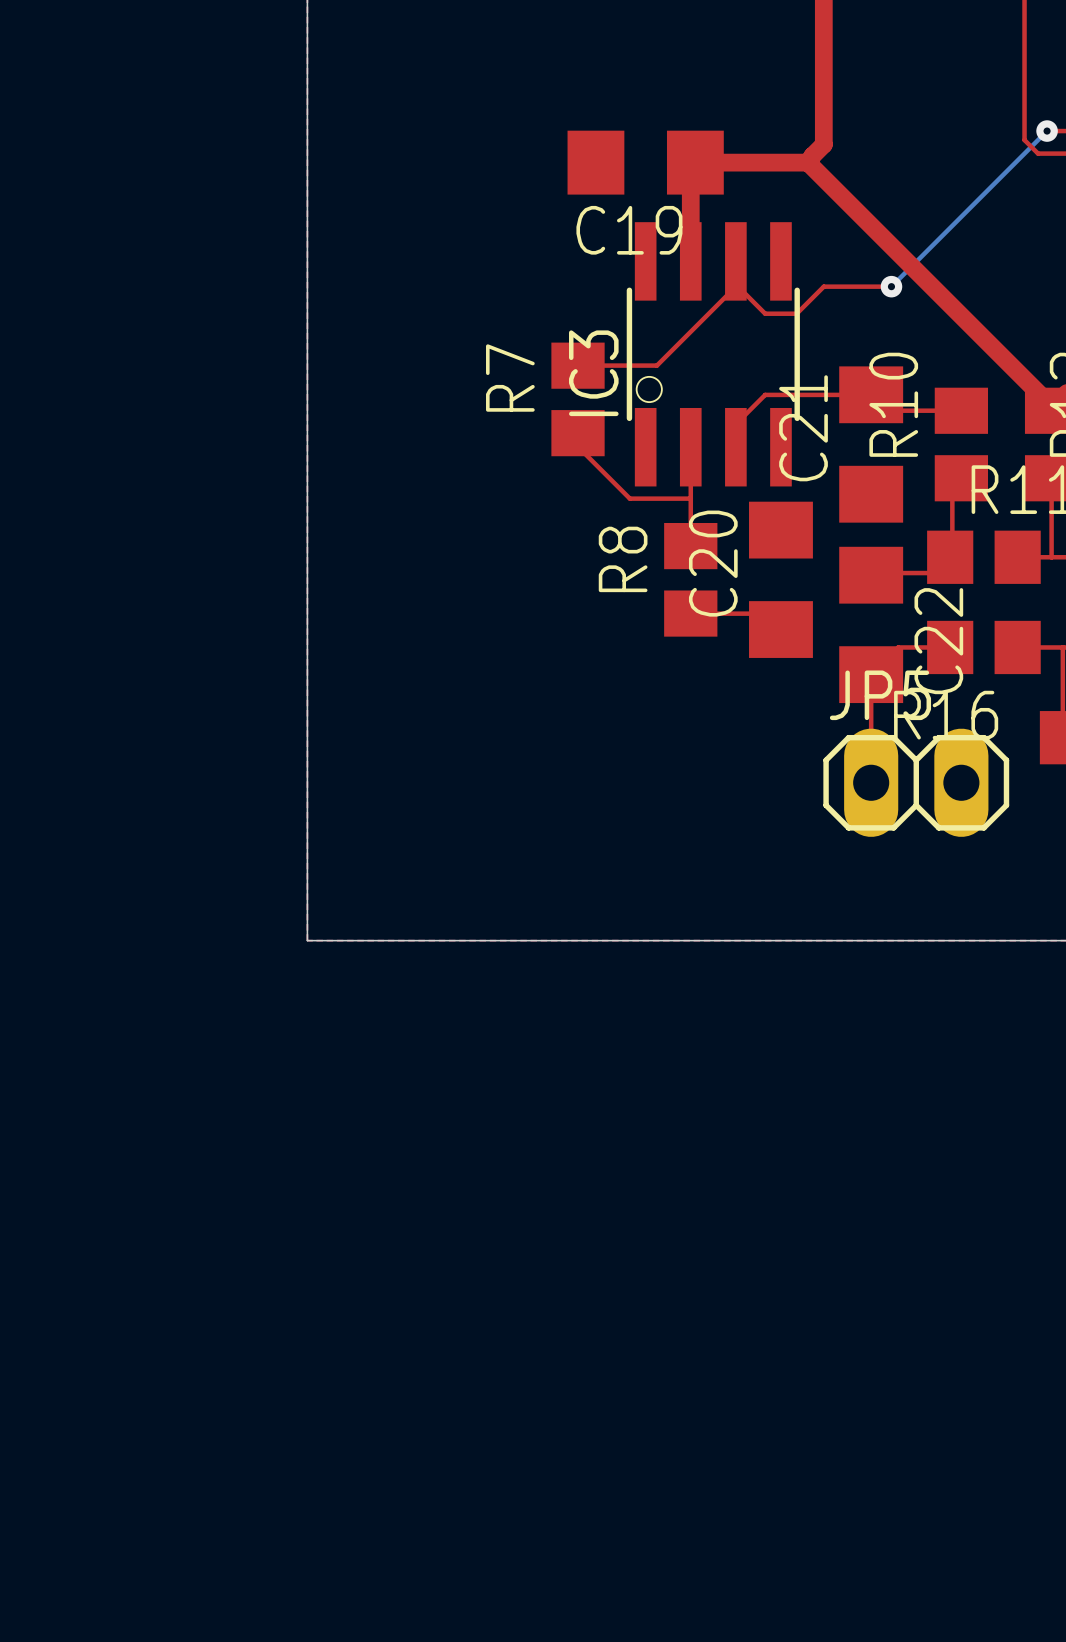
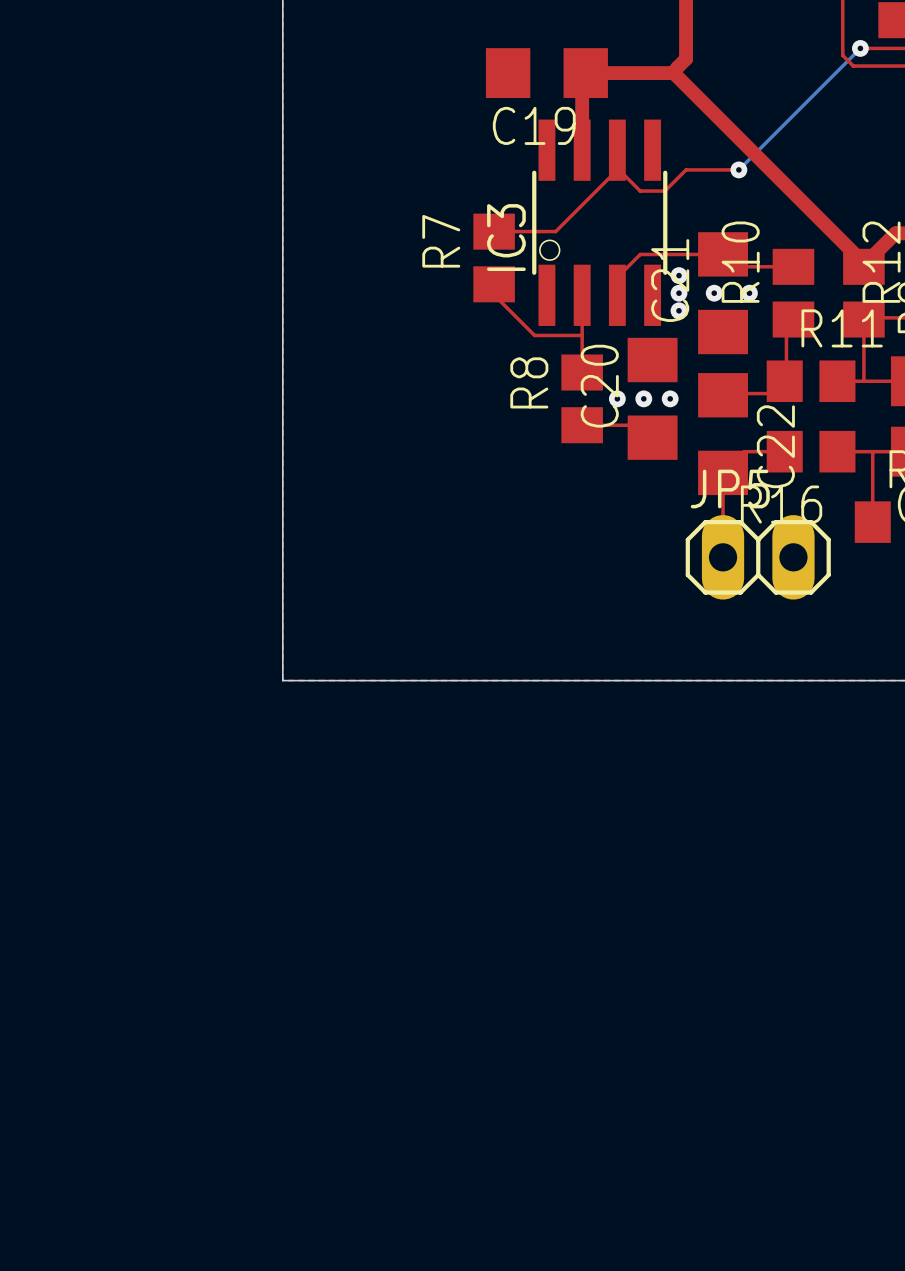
via: none -> (679, 275)
via: none -> (679, 293)
via: none -> (714, 293)
via: none -> (749, 293)
via: none -> (679, 310)
via: none -> (617, 398)
via: none -> (643, 398)
via: none -> (670, 398)

